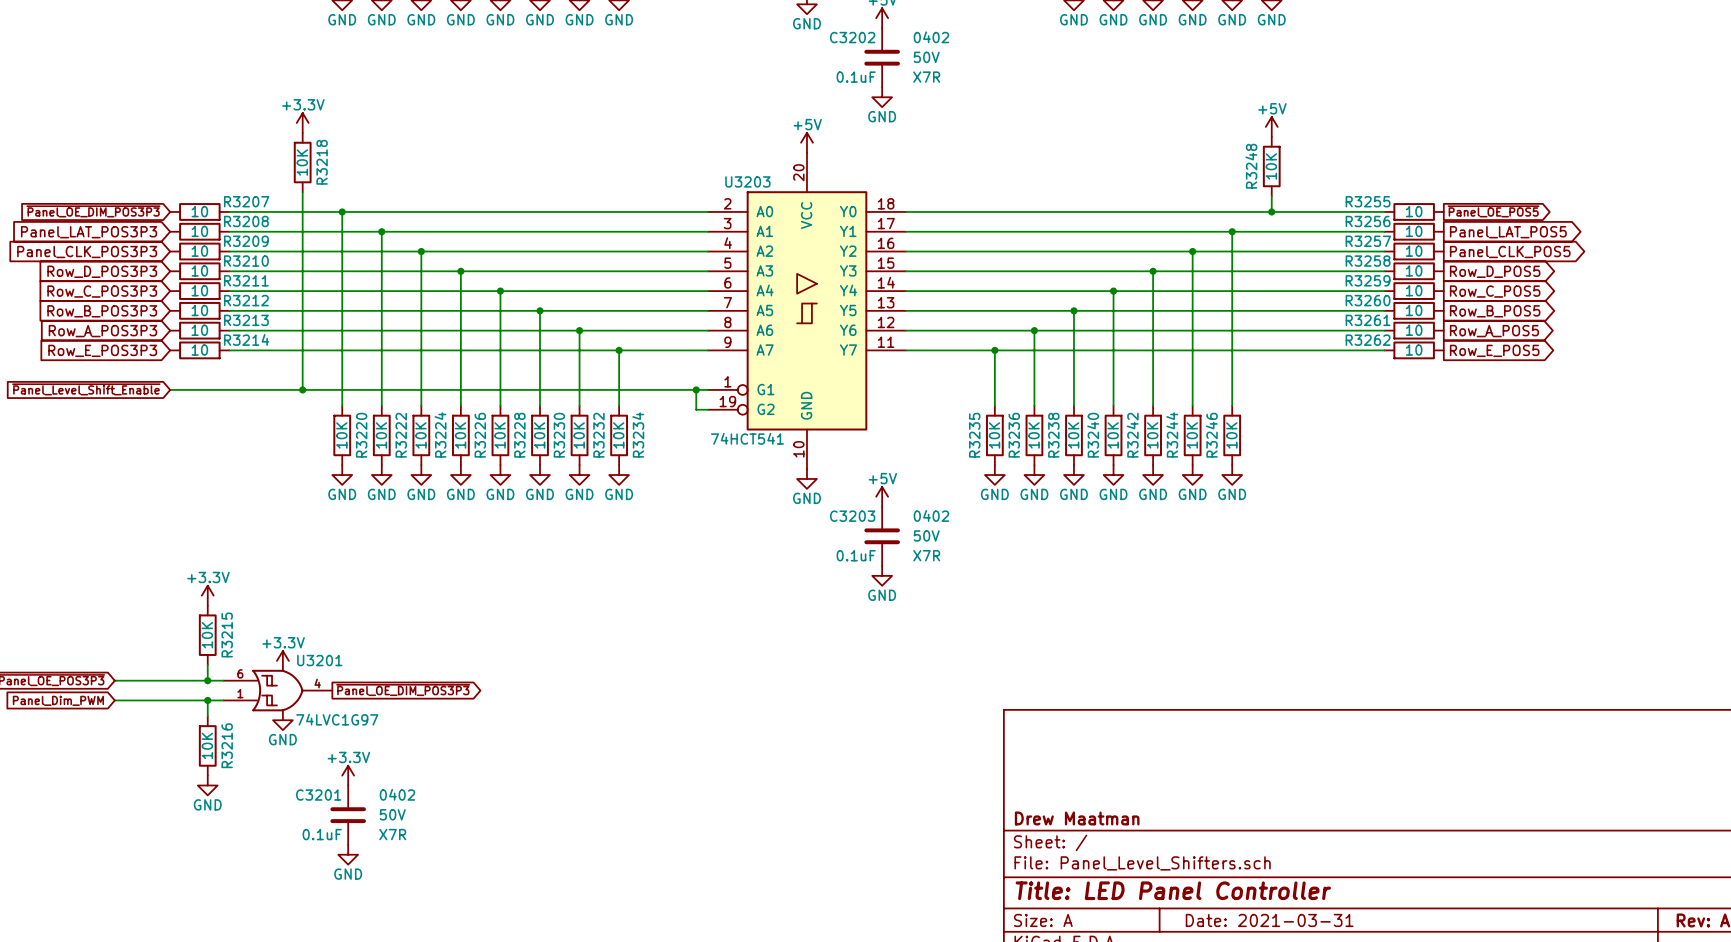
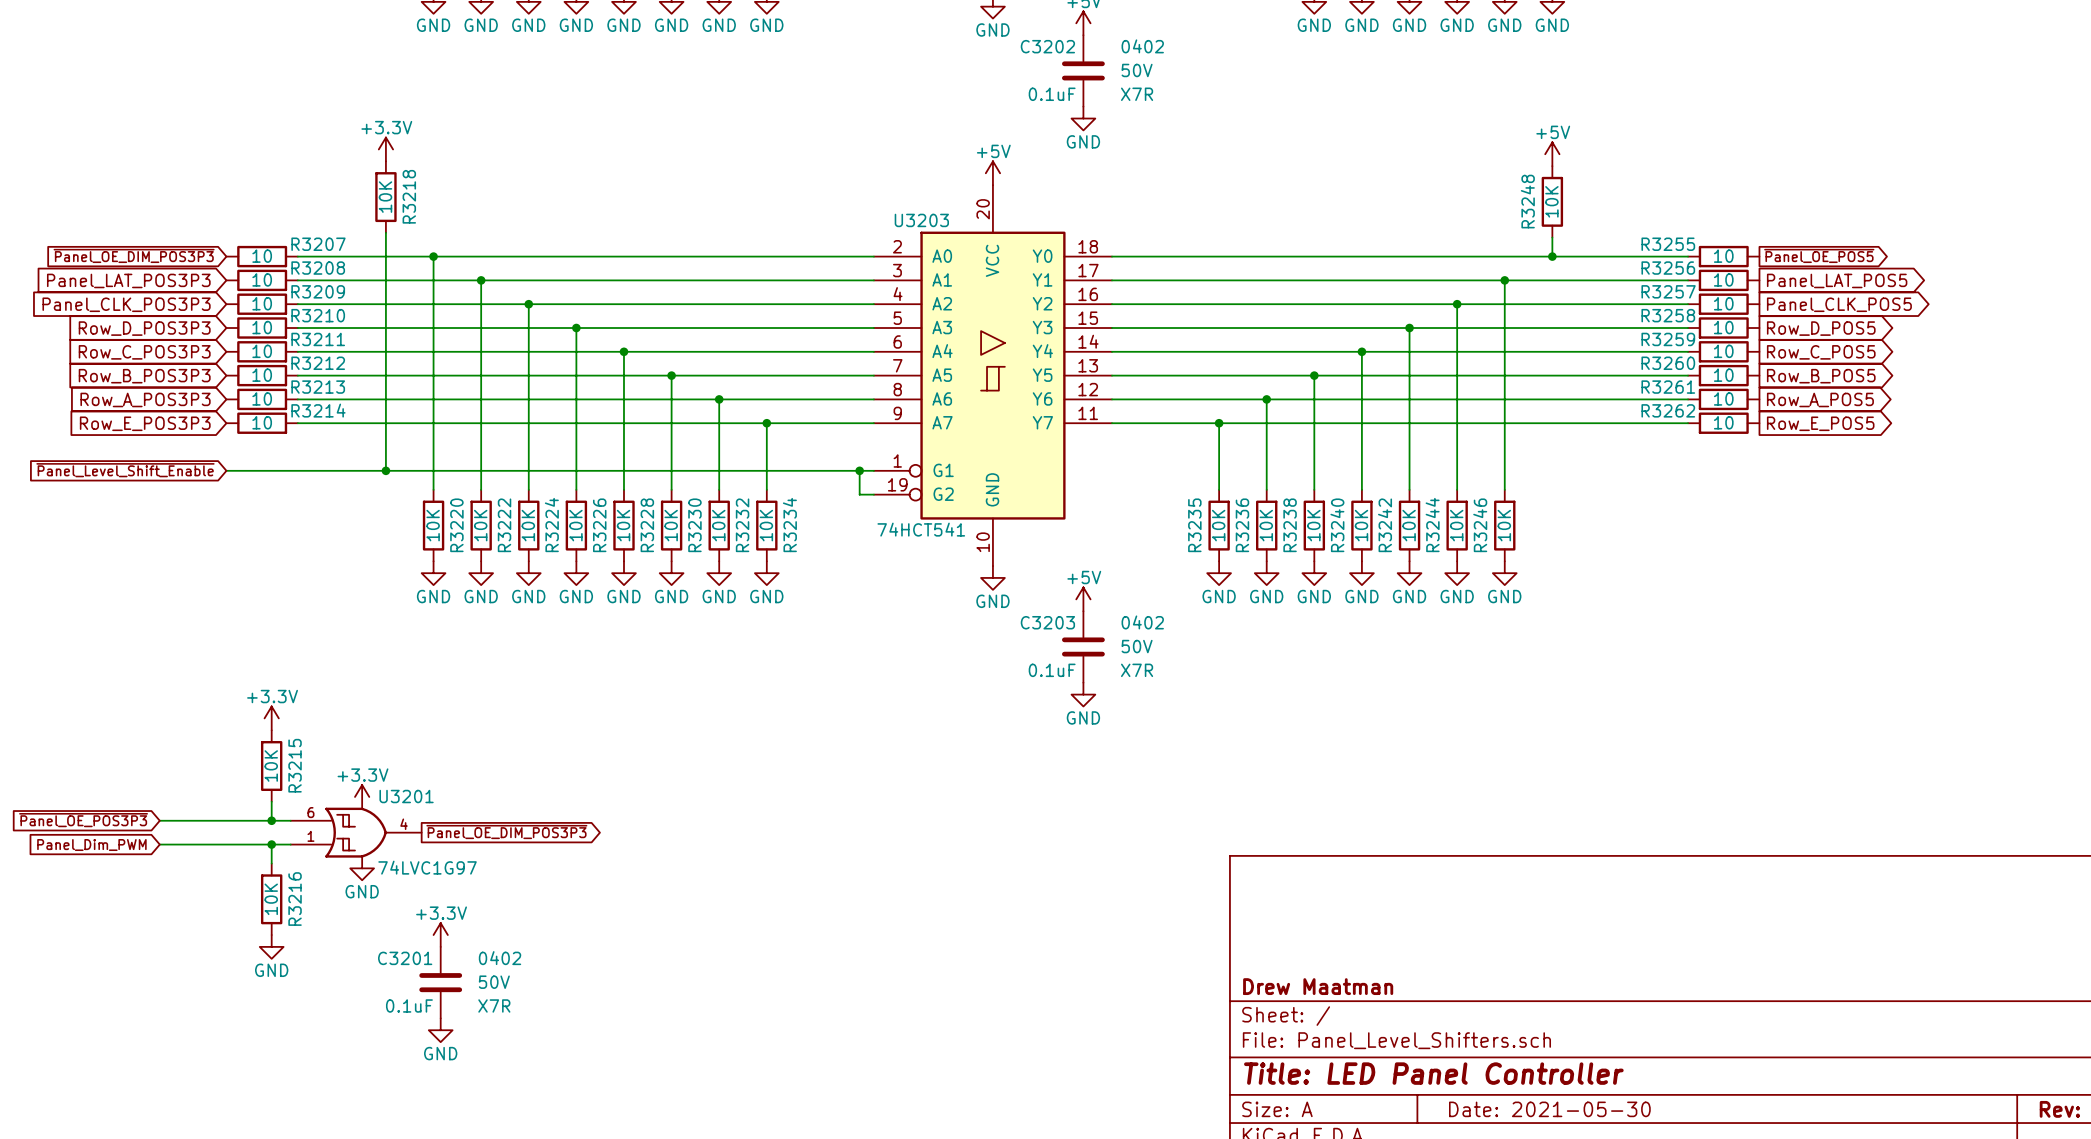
title block: Date: 2021-03-31 (1269, 920) -> Date: 2021-05-30 (1549, 1109)

